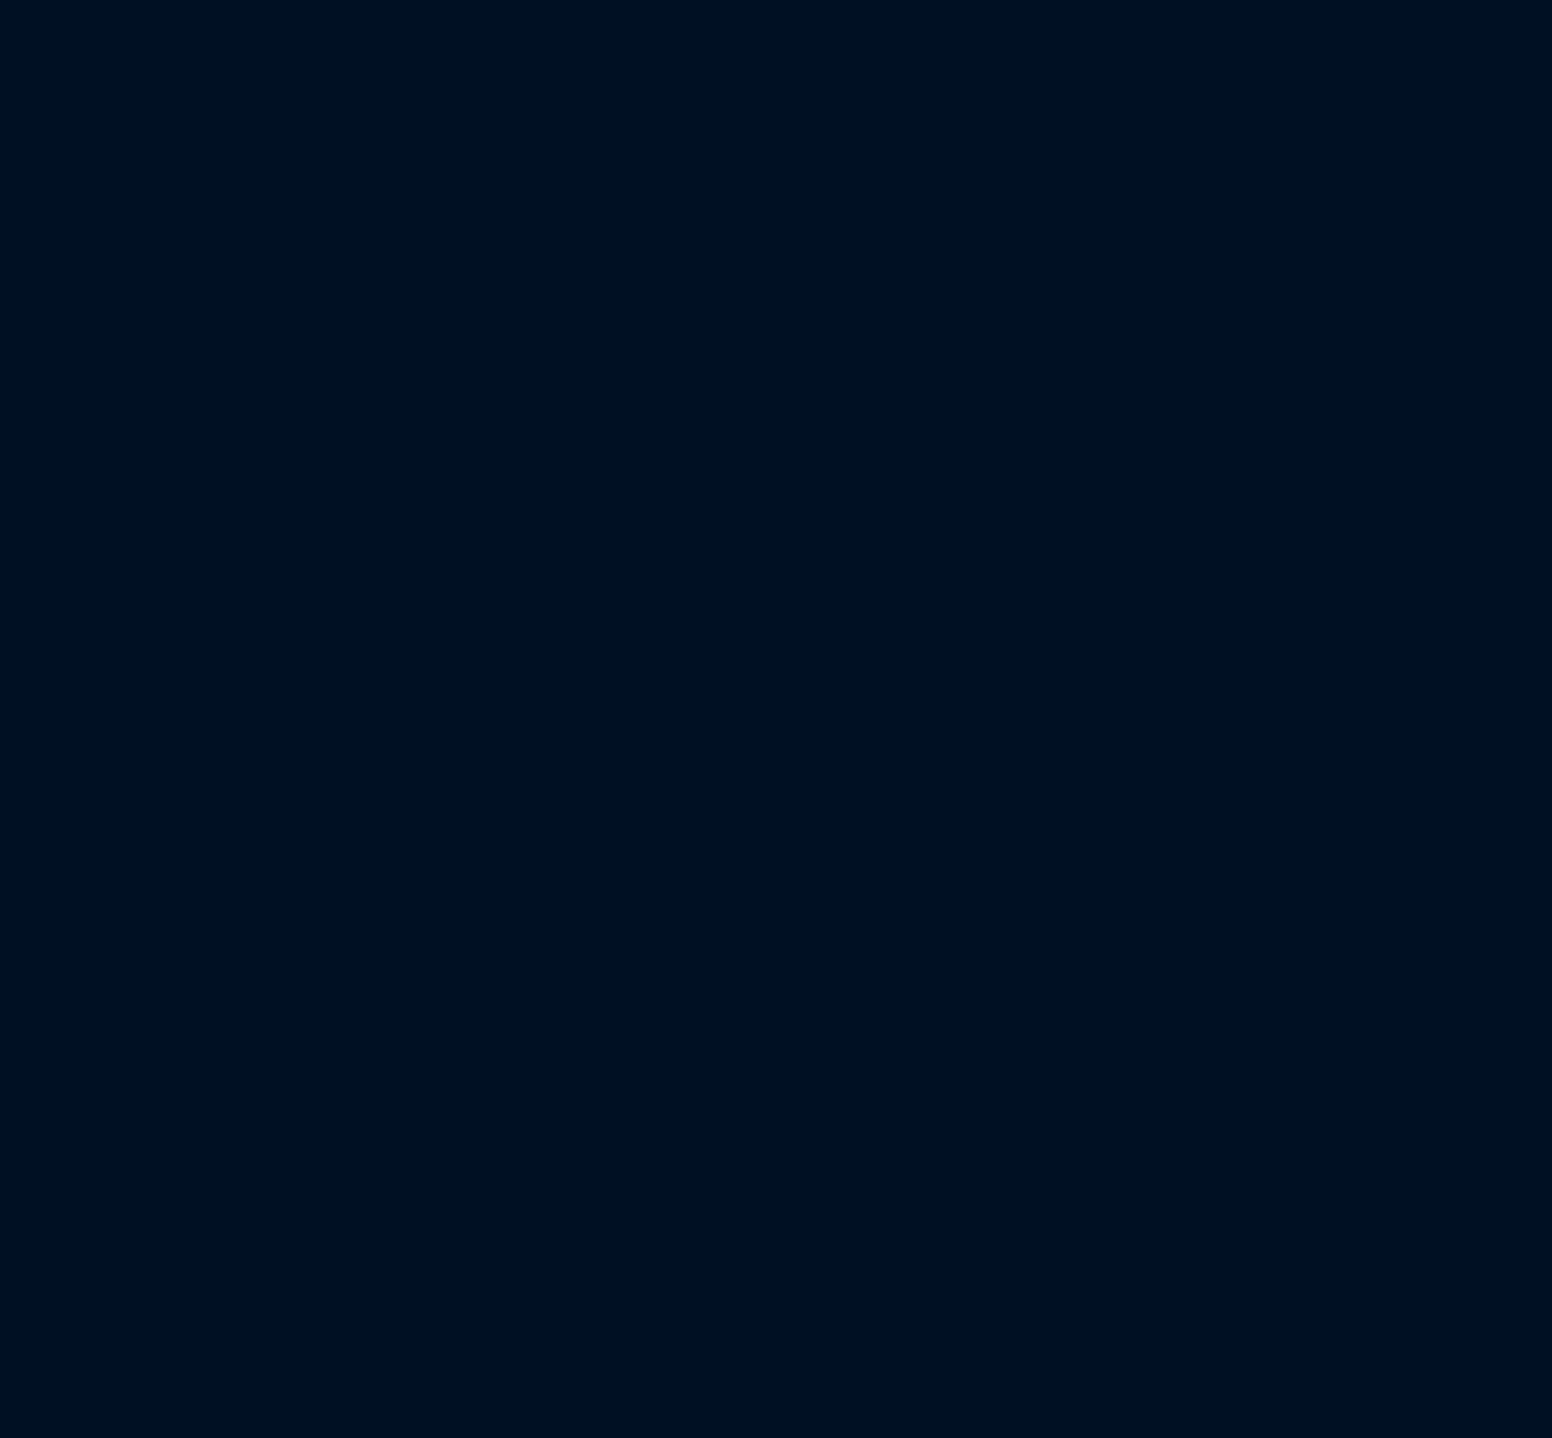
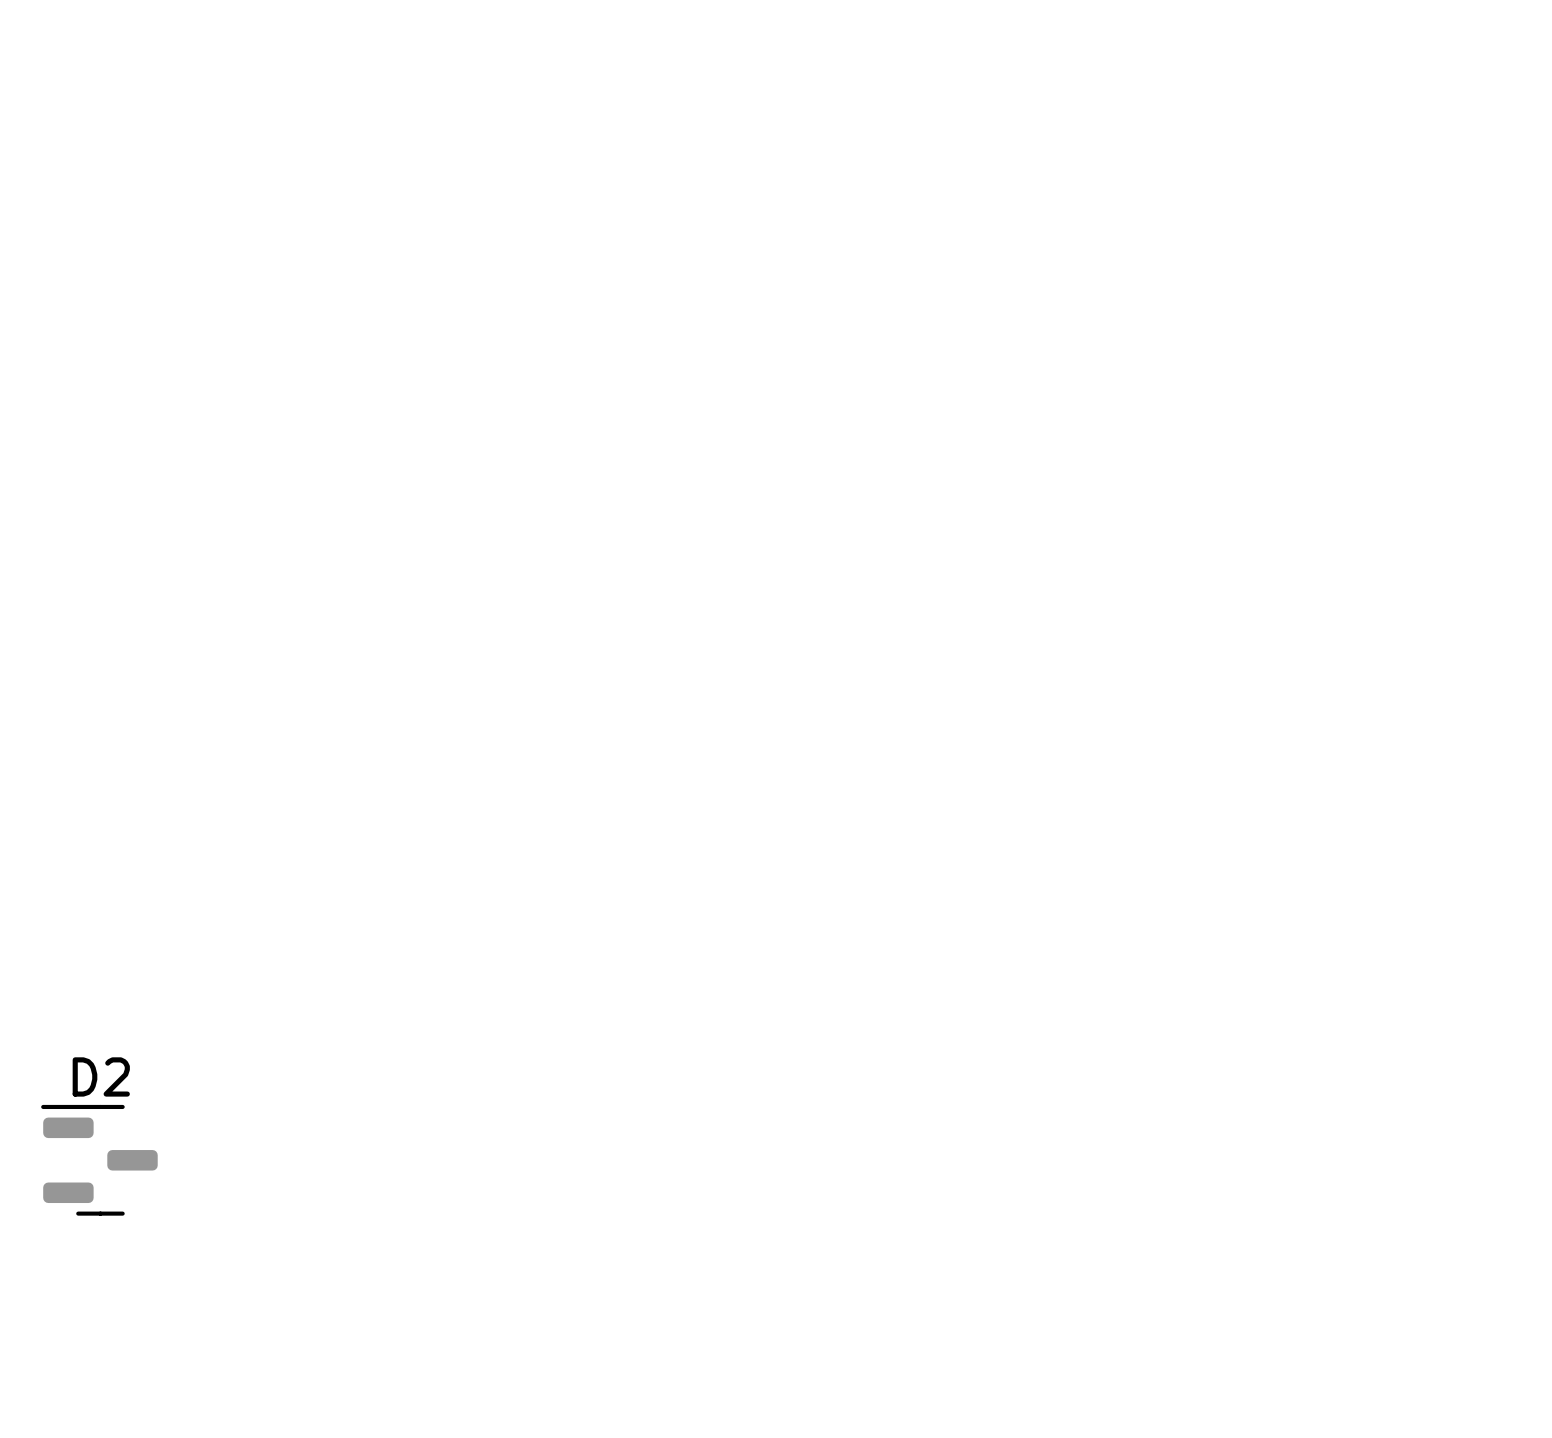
D2: none -> (99, 1160)

